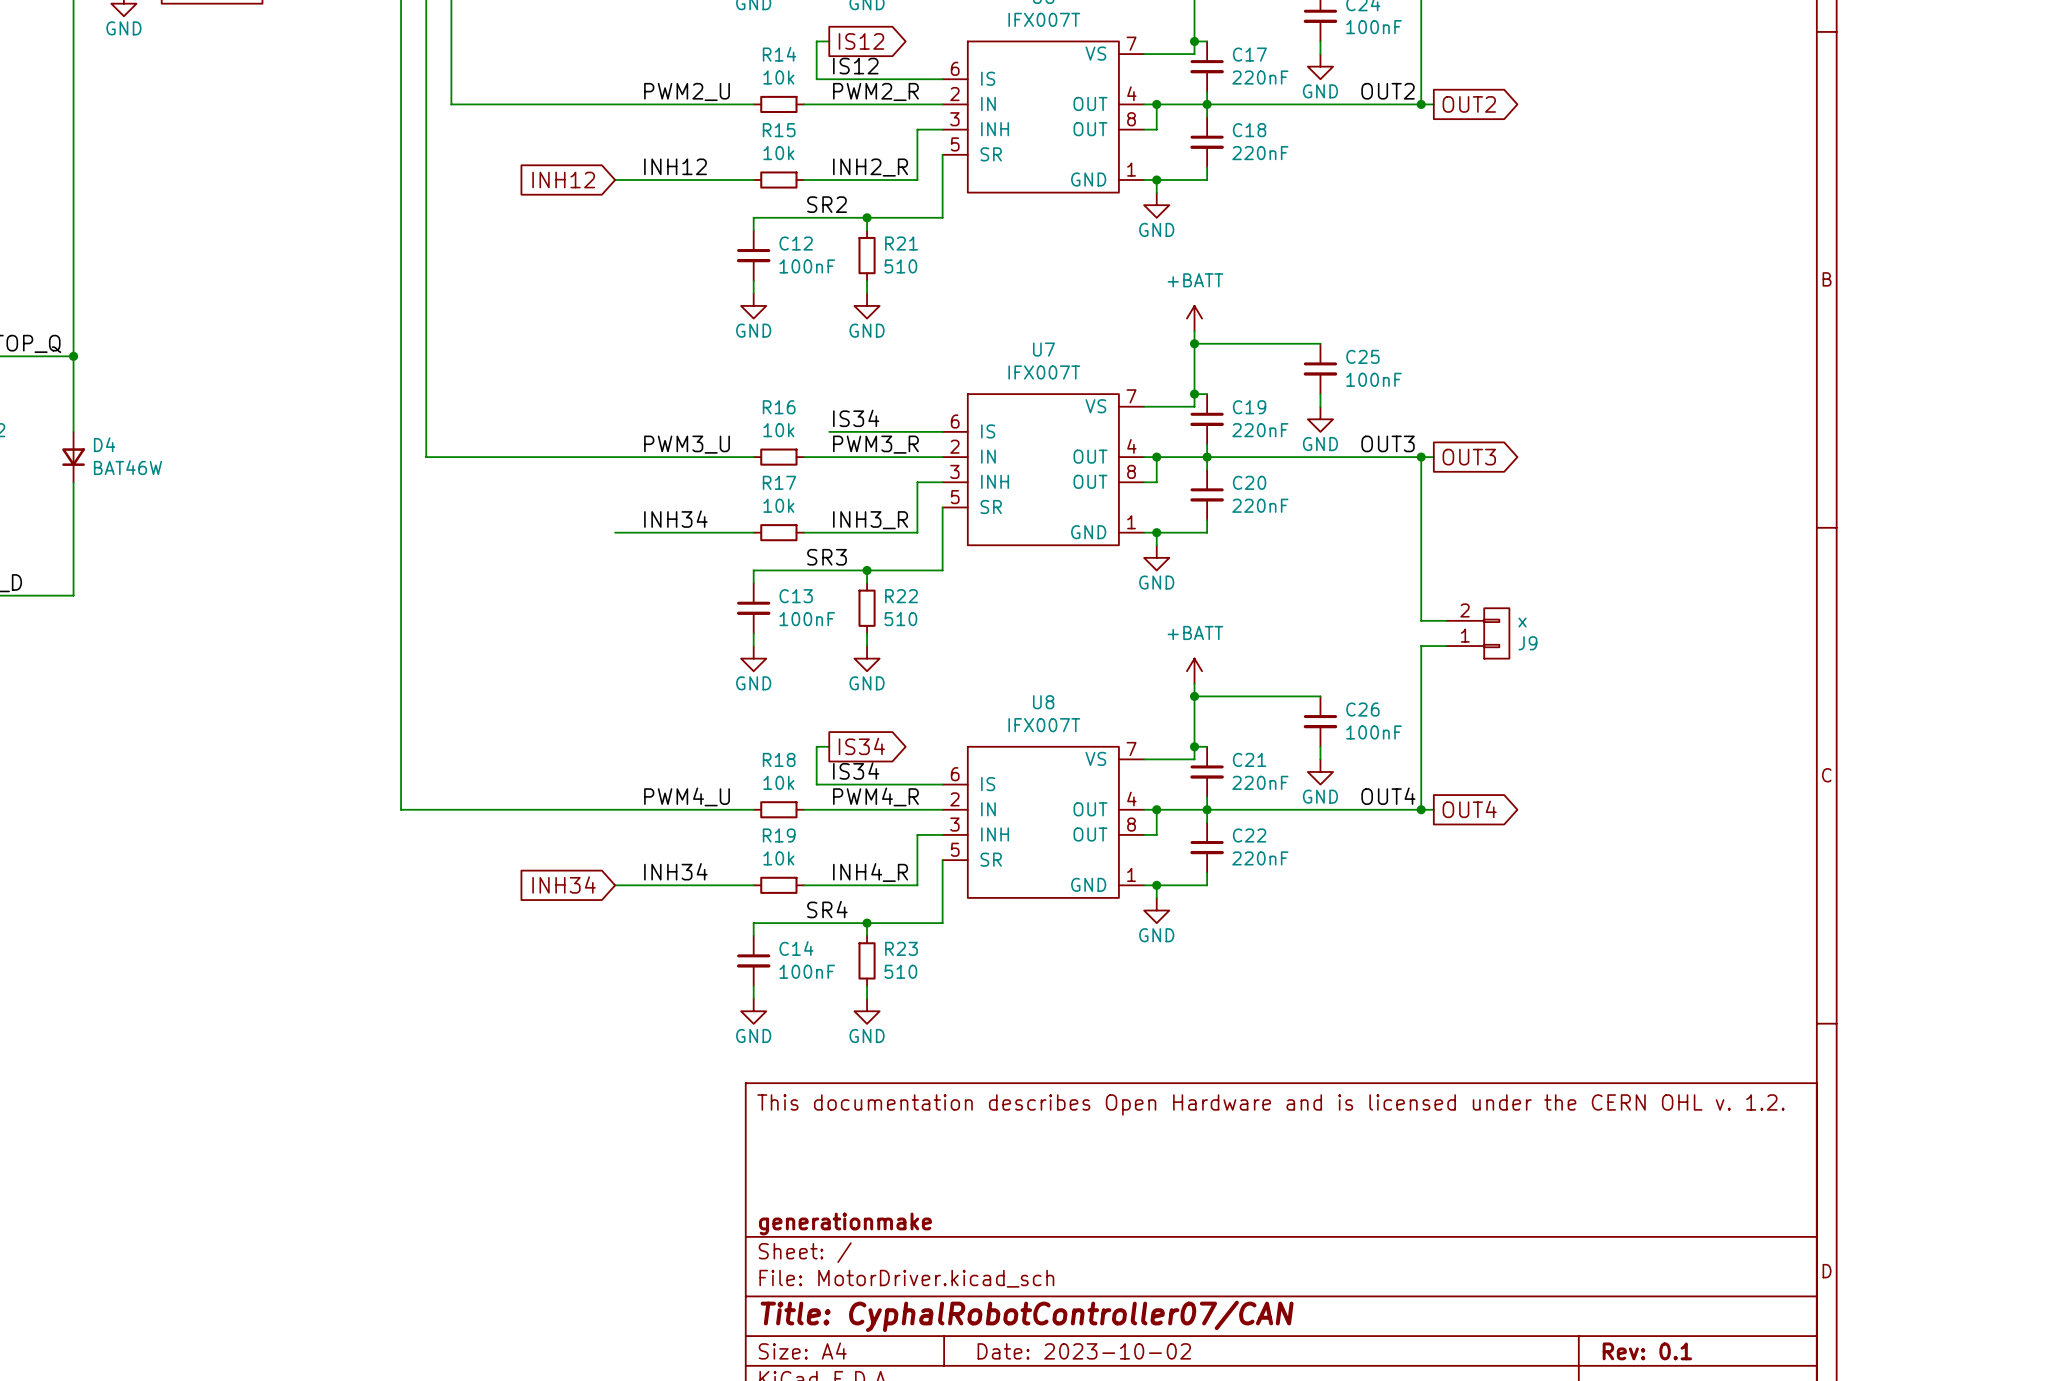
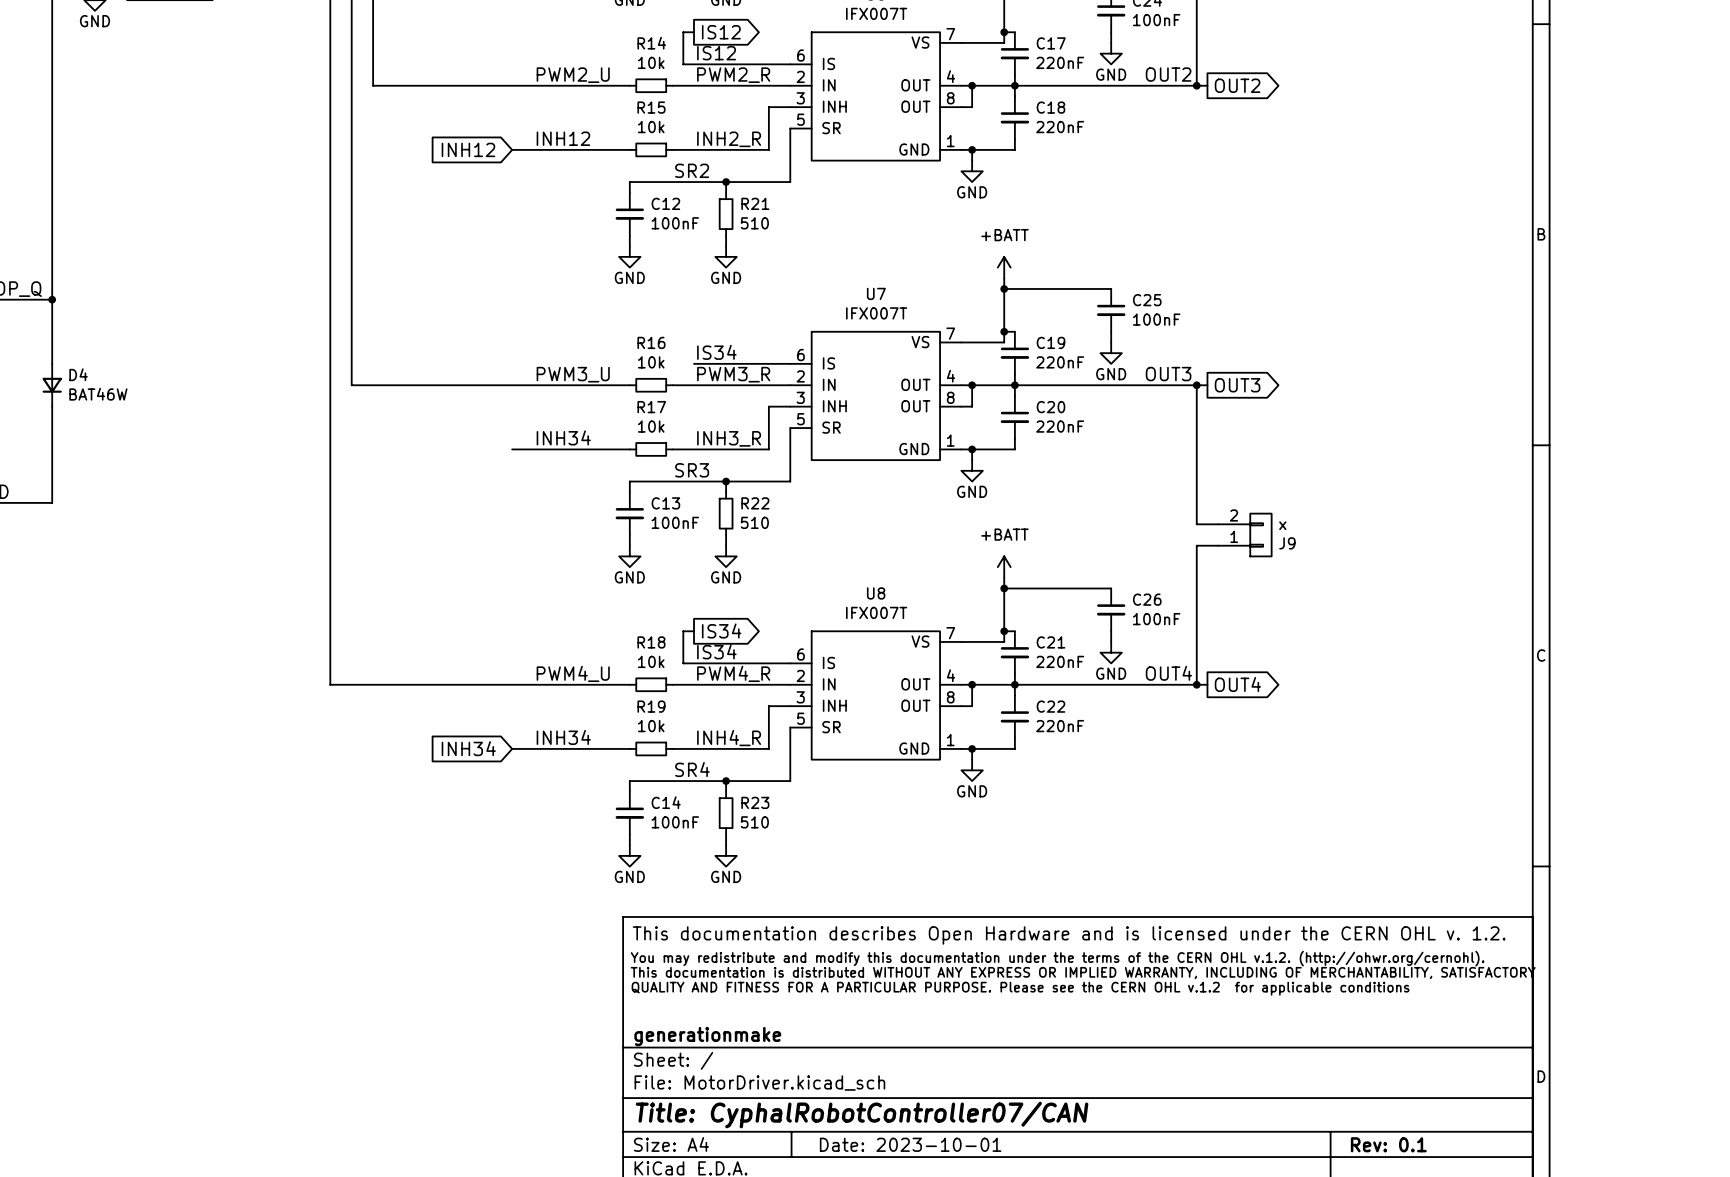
text: none -> You may redistribute and modify this documentation under the terms of the CERN OHL v.1.2. (http://ohwr.org/cernohl). (1057, 958)
text: none -> This documentation is distributed WITHOUT ANY EXPRESS OR IMPLIED WARRANTY, INCLUDING OF MERCHANTABILITY, SATISFACTORY (1083, 972)
text: none -> QUALITY AND FITNESS FOR A PARTICULAR PURPOSE. Please see the CERN OHL v.1.2 for applicable conditions (1020, 988)
title block: Date: 2023-10-02 (1084, 1351) -> Date: 2023-10-01 (910, 1144)

